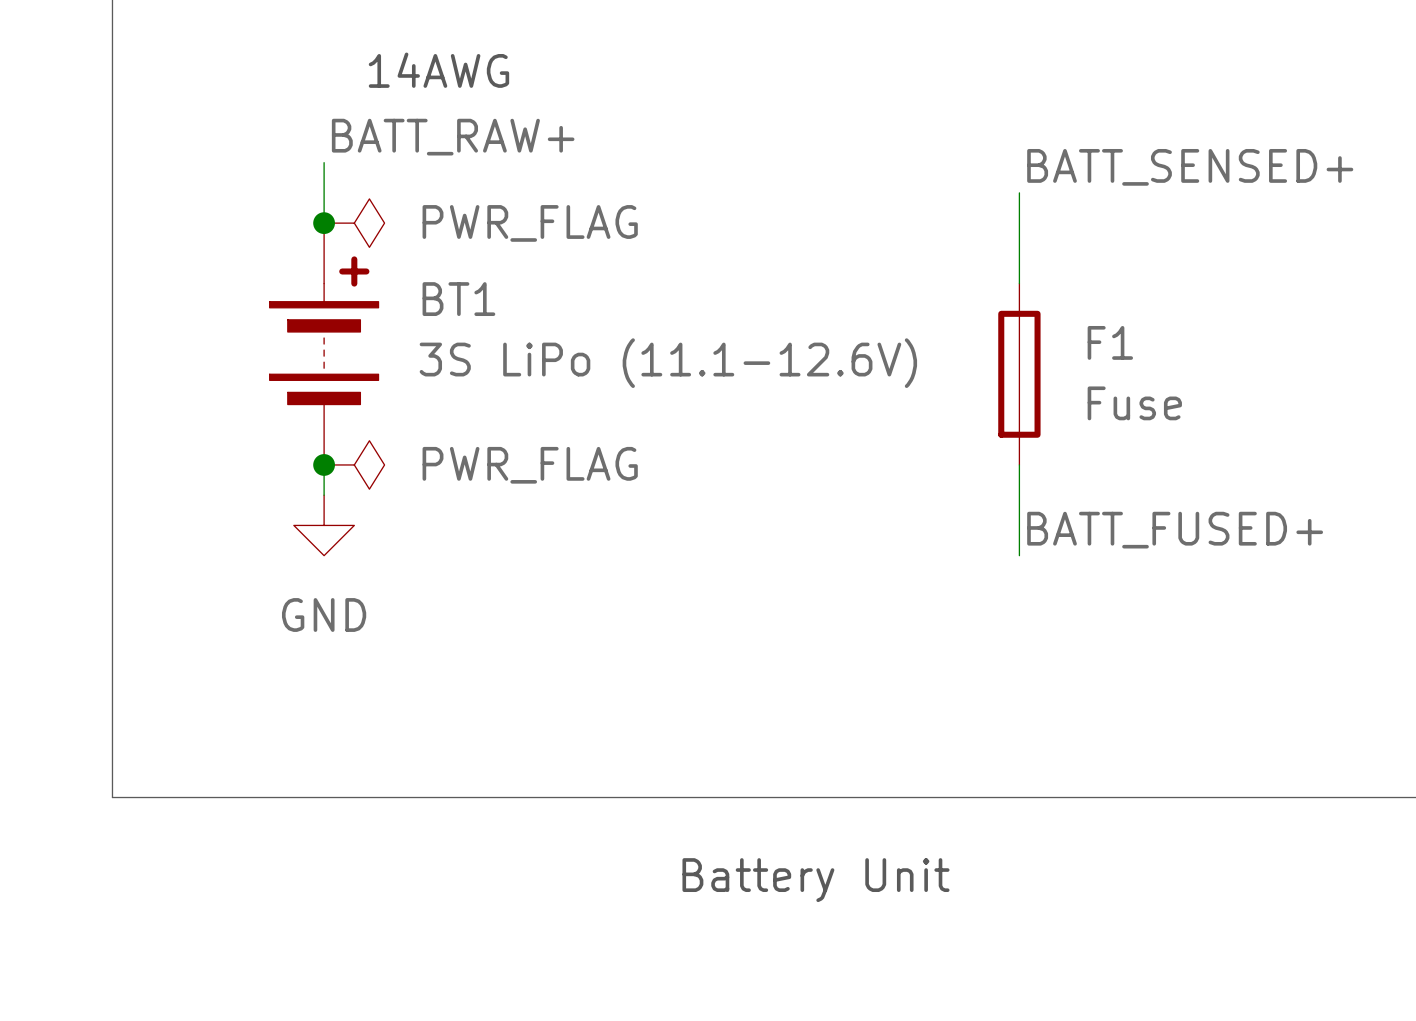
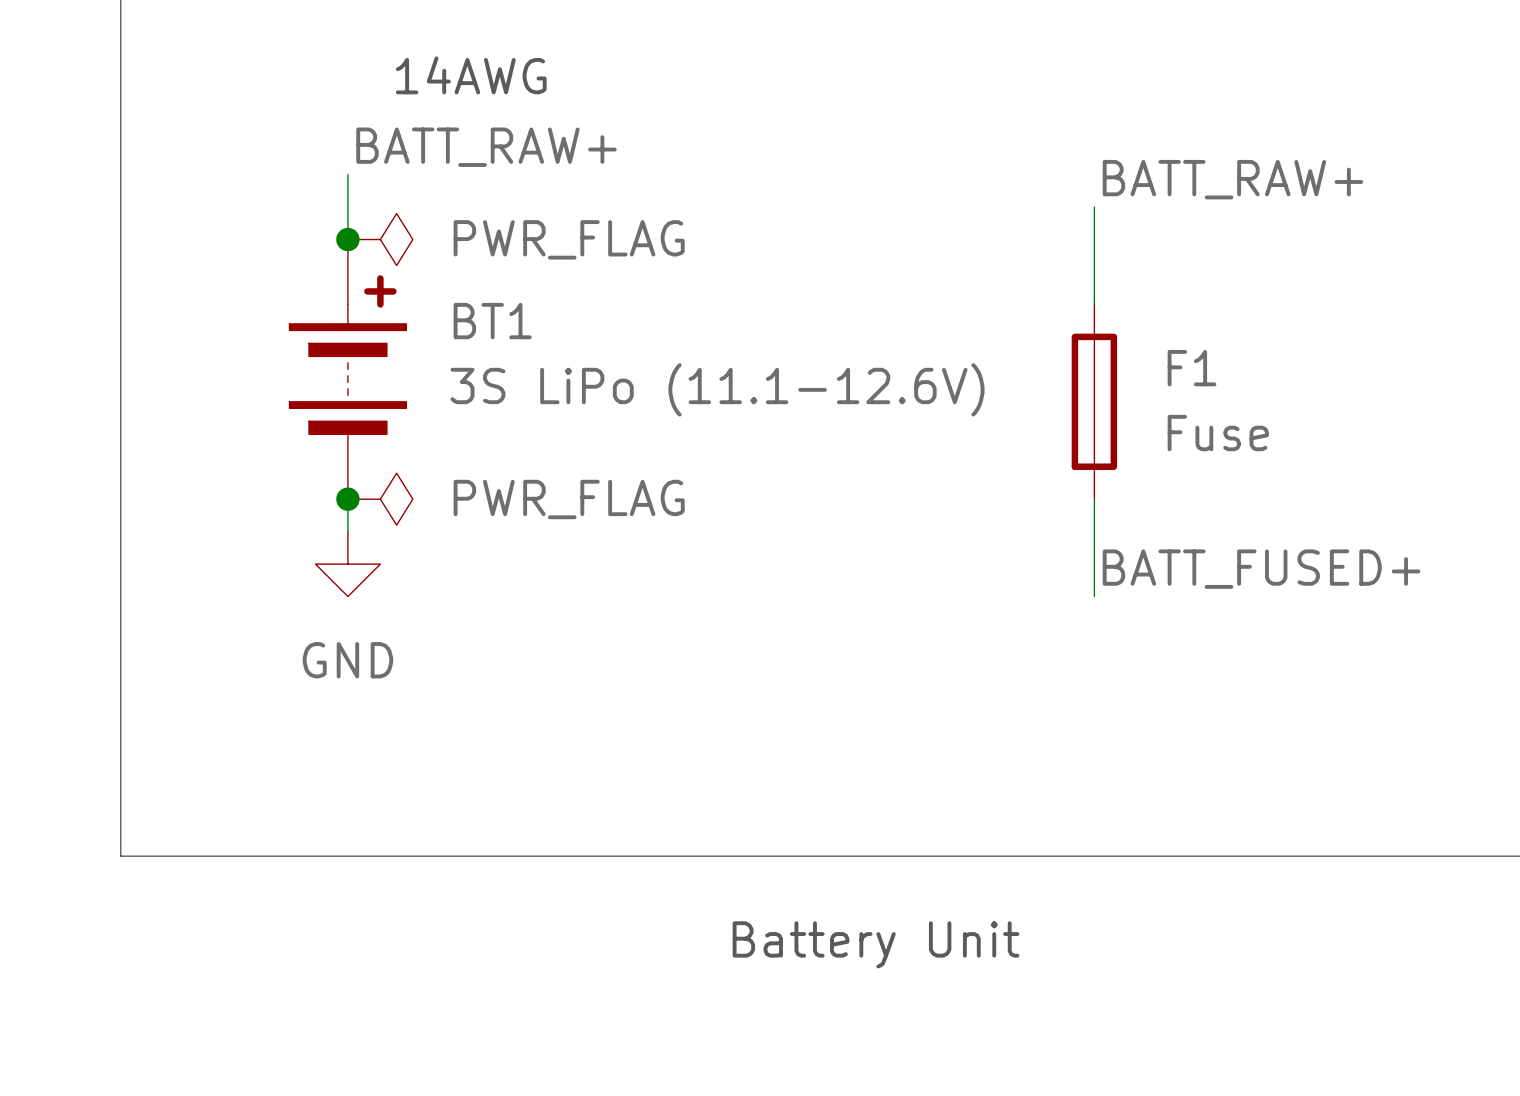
label: BATT_SENSED+ (1190, 167) -> BATT_RAW+ (1232, 179)

